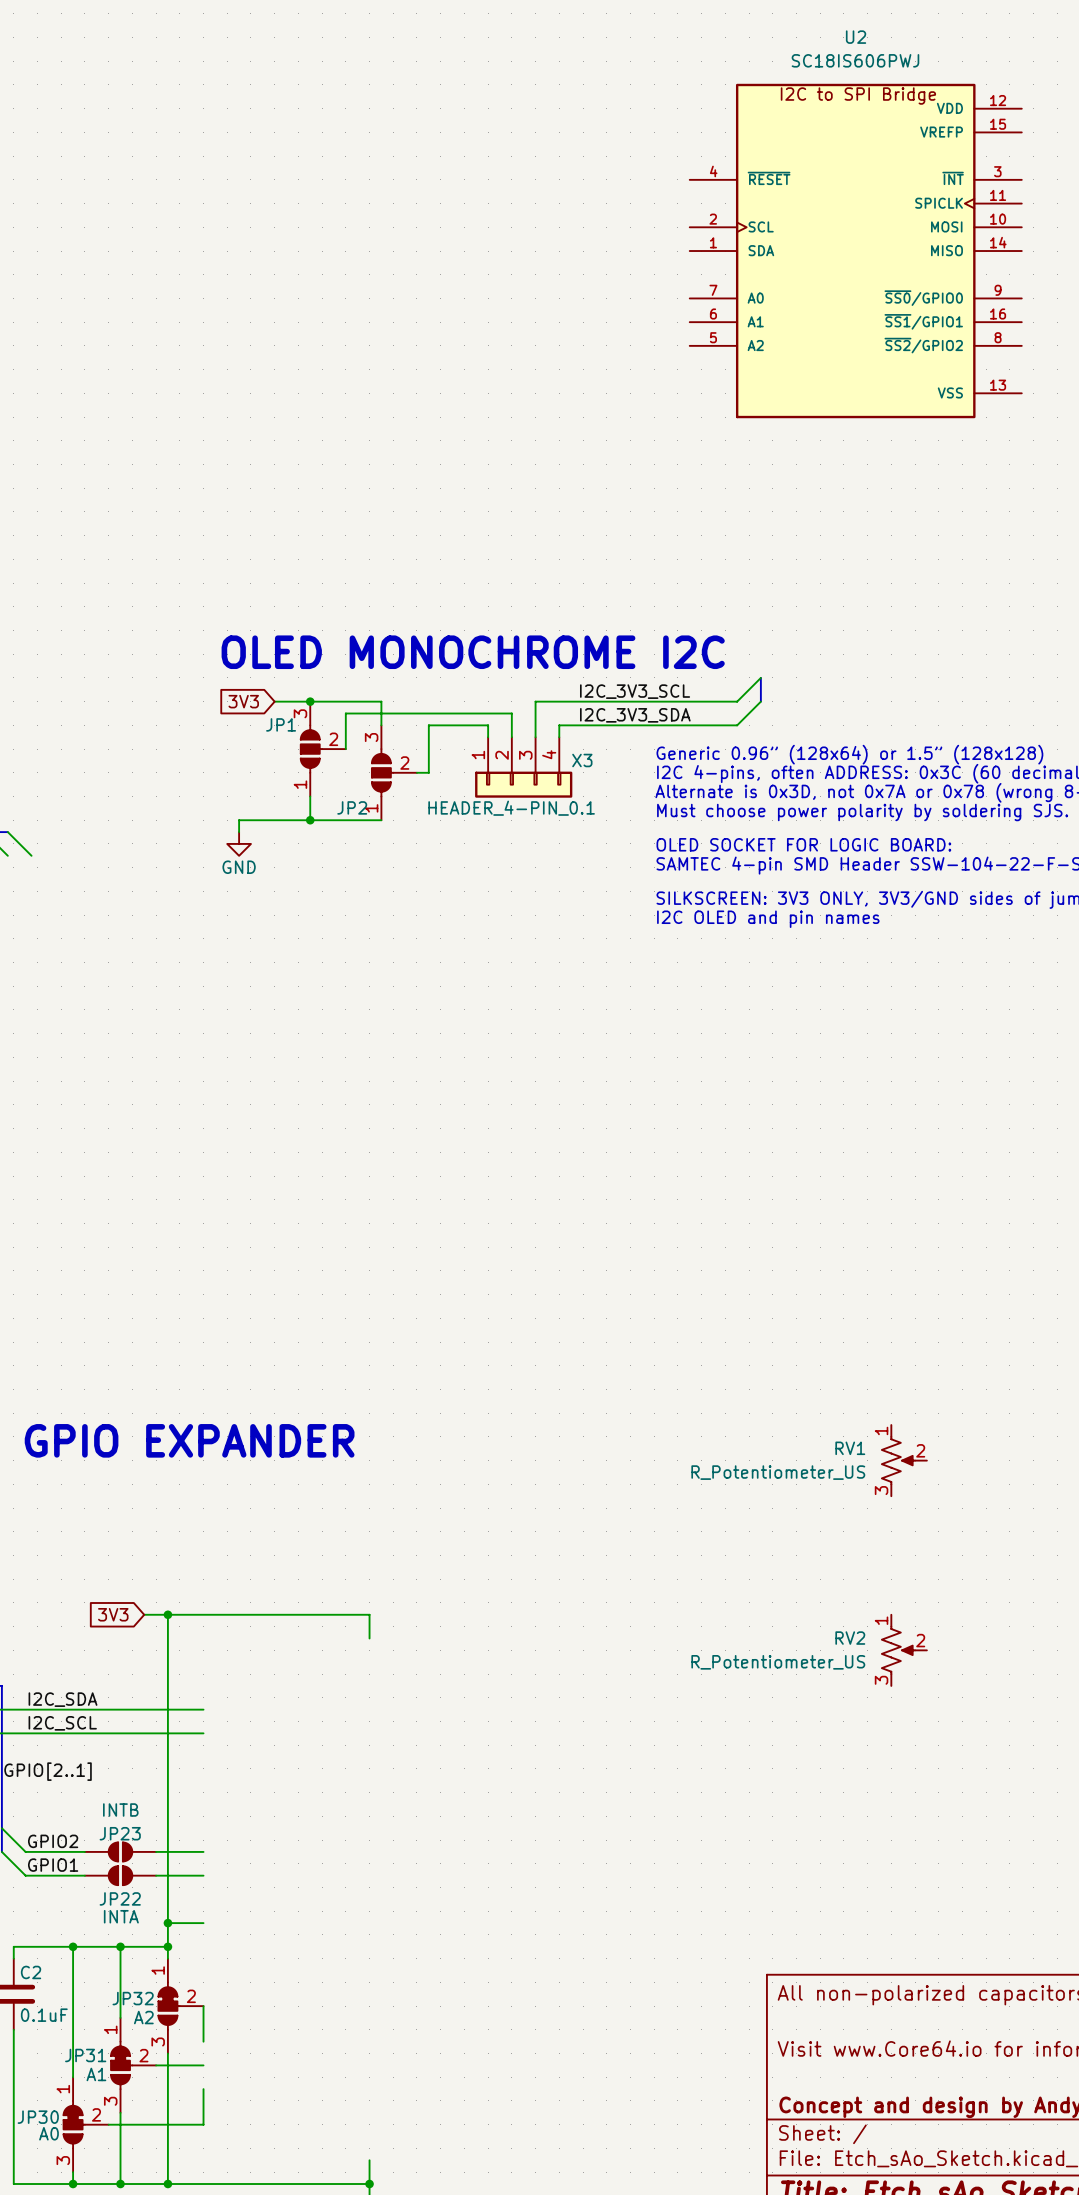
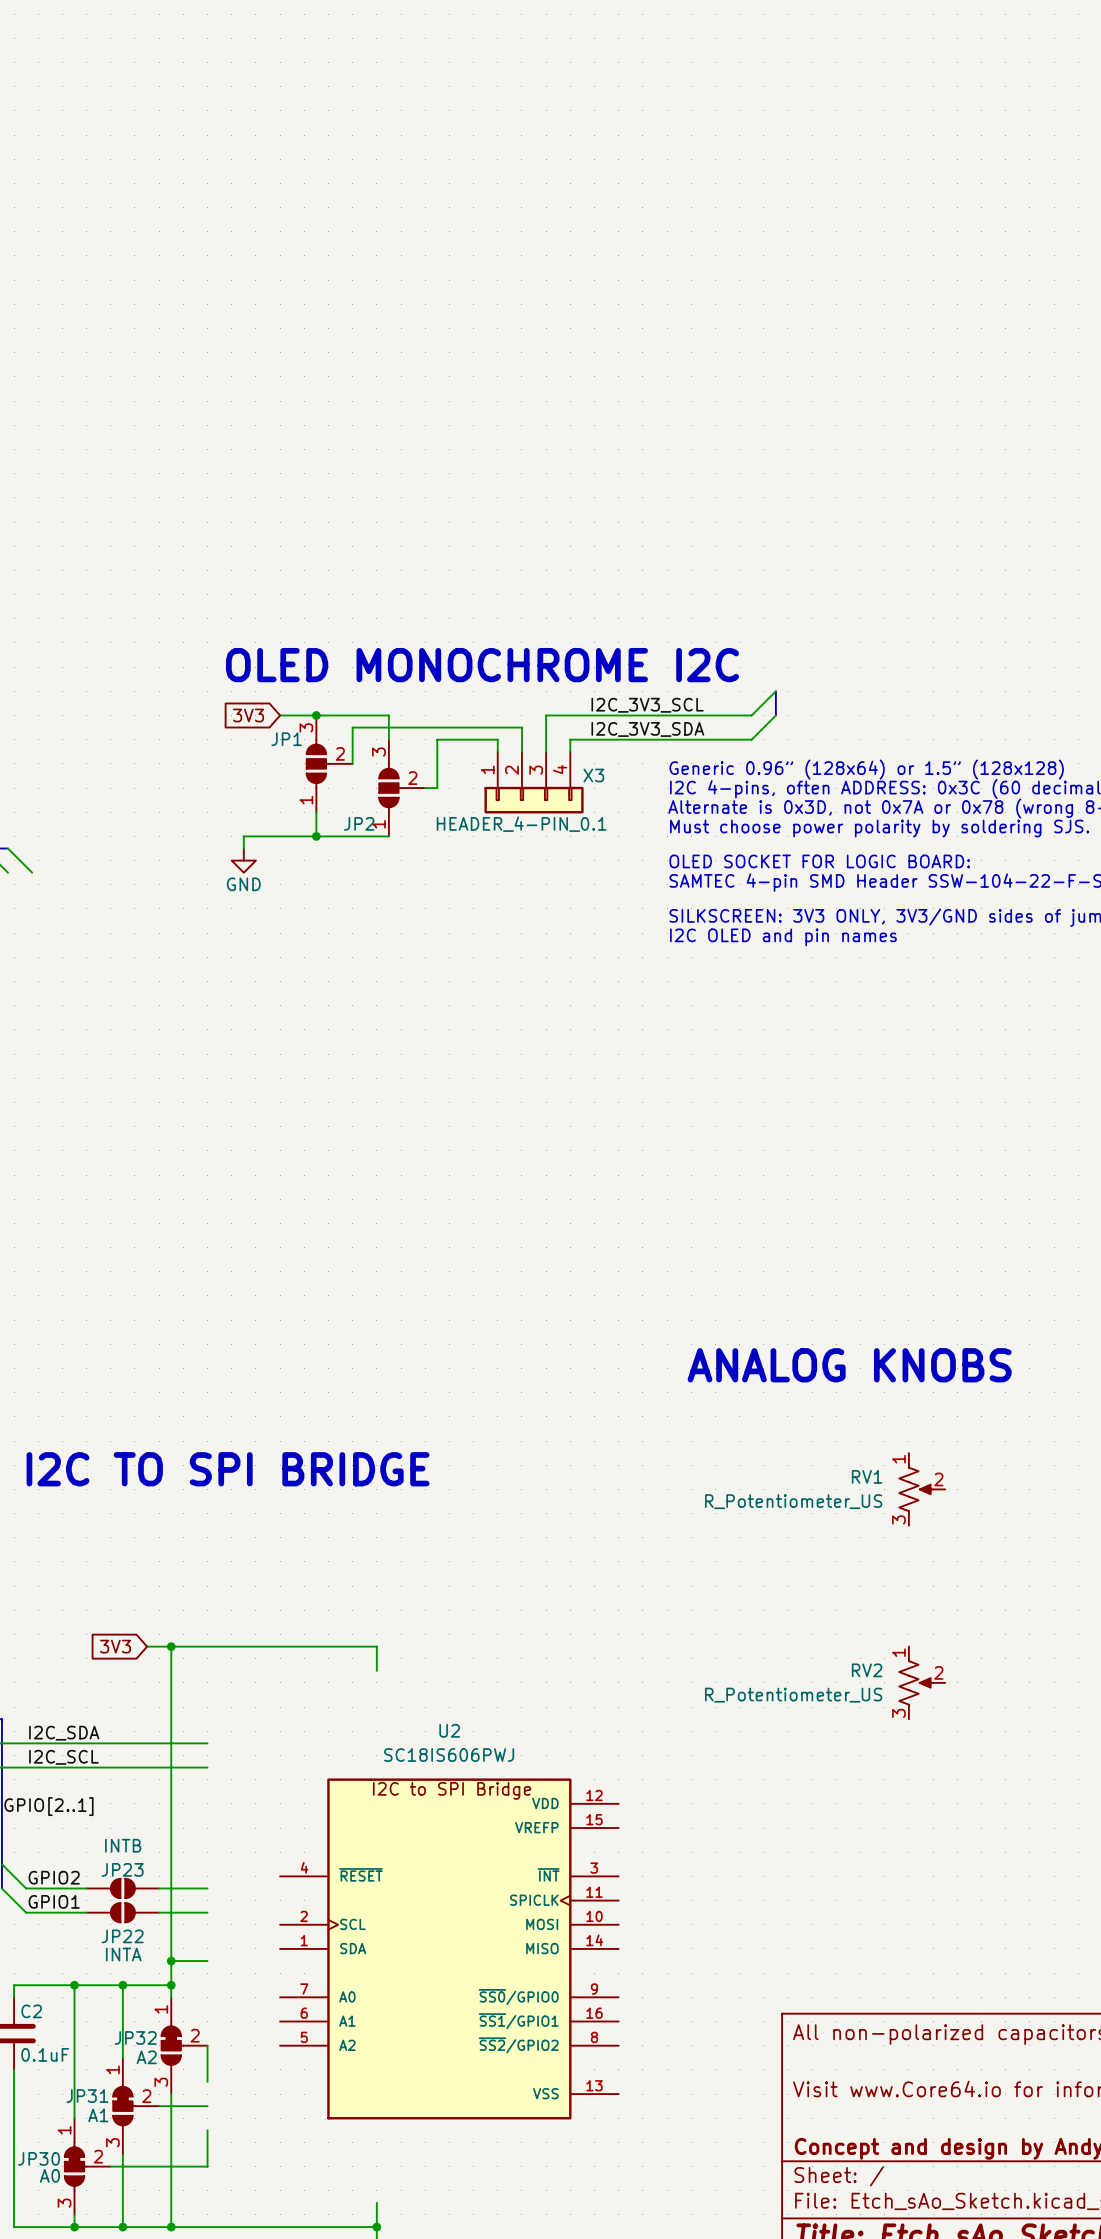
U2 position: (855, 251) -> (449, 1948)
text: none -> ANALOG KNOBS (849, 1365)
text: GPIO EXPANDER (189, 1440) -> I2C TO SPI BRIDGE (228, 1469)

